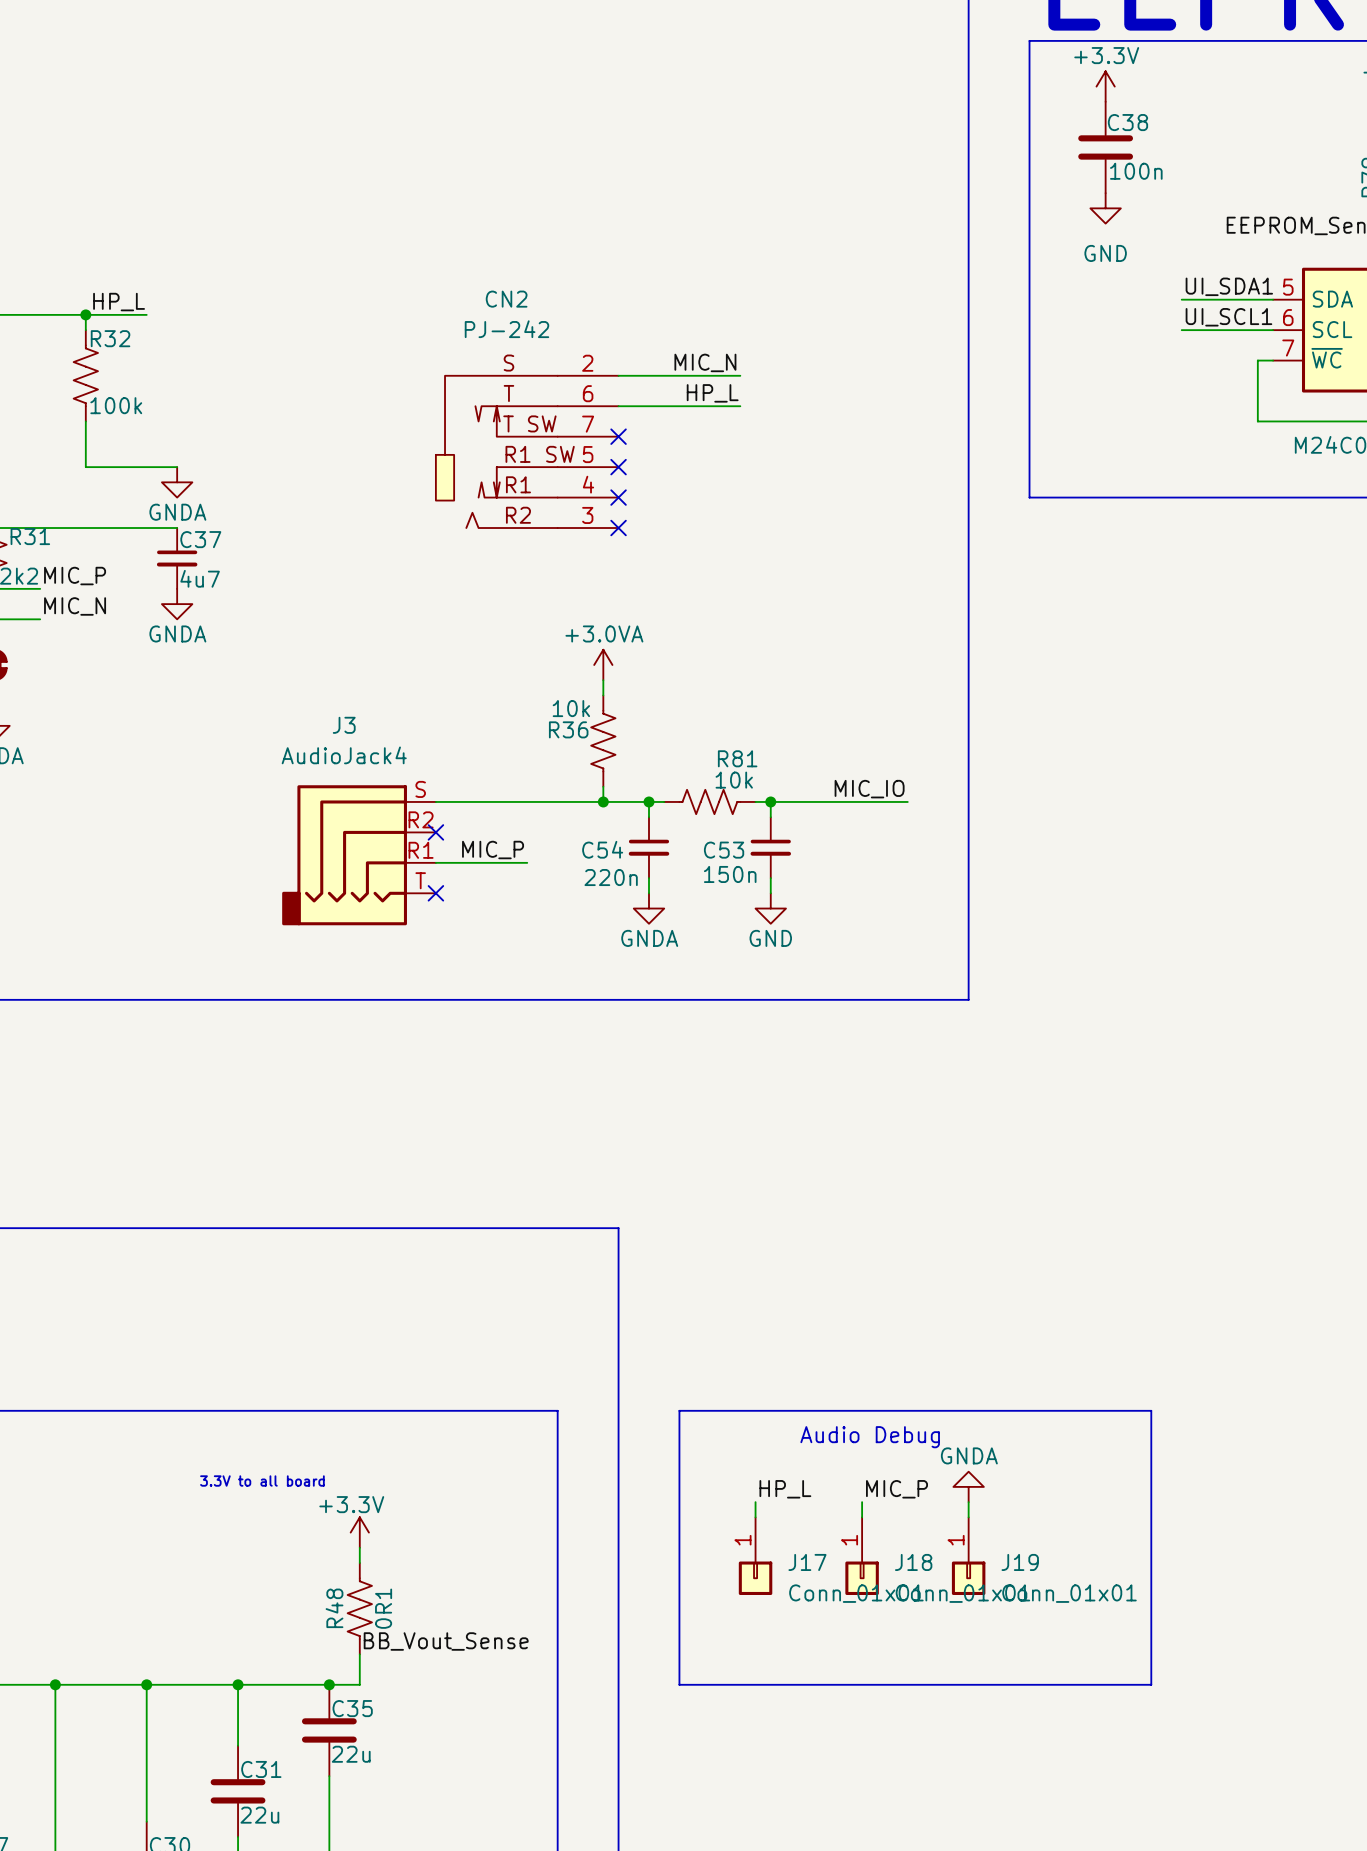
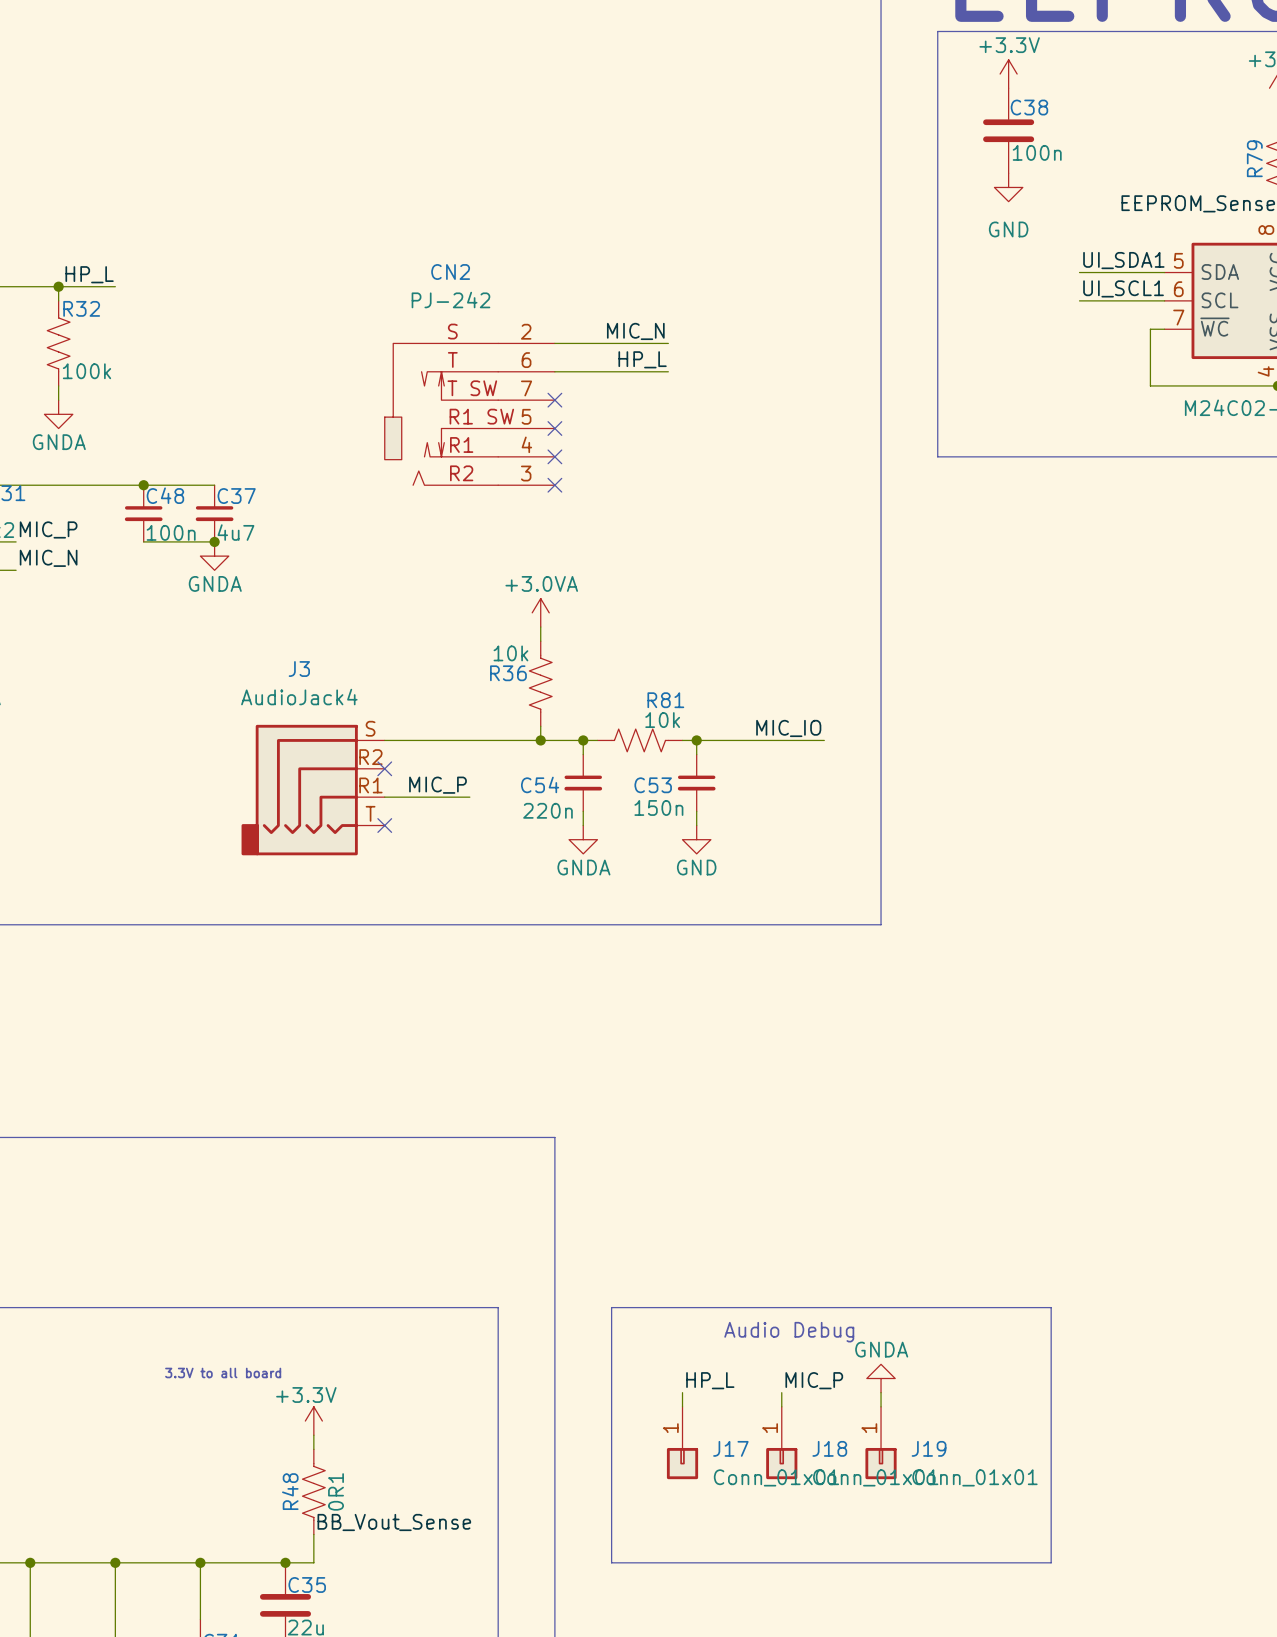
wire: (85, 436) (85, 467) (177, 467) -> none
power symbol: none -> GNDA (58, 414)
power symbol: GNDA (177, 482) -> none
wire: none -> (143, 485) (214, 485)
junction: none -> (143, 485)
C37 name: C37 (200, 539) -> C48 (165, 495)
C37: none -> 4u7 (214, 513)
C37 value: 4u7 (200, 578) -> 100n (171, 532)
wire: none -> (143, 541) (214, 541)
junction: none -> (214, 541)
power symbol: GNDA (177, 604) -> none
power symbol: none -> GNDA (214, 556)

